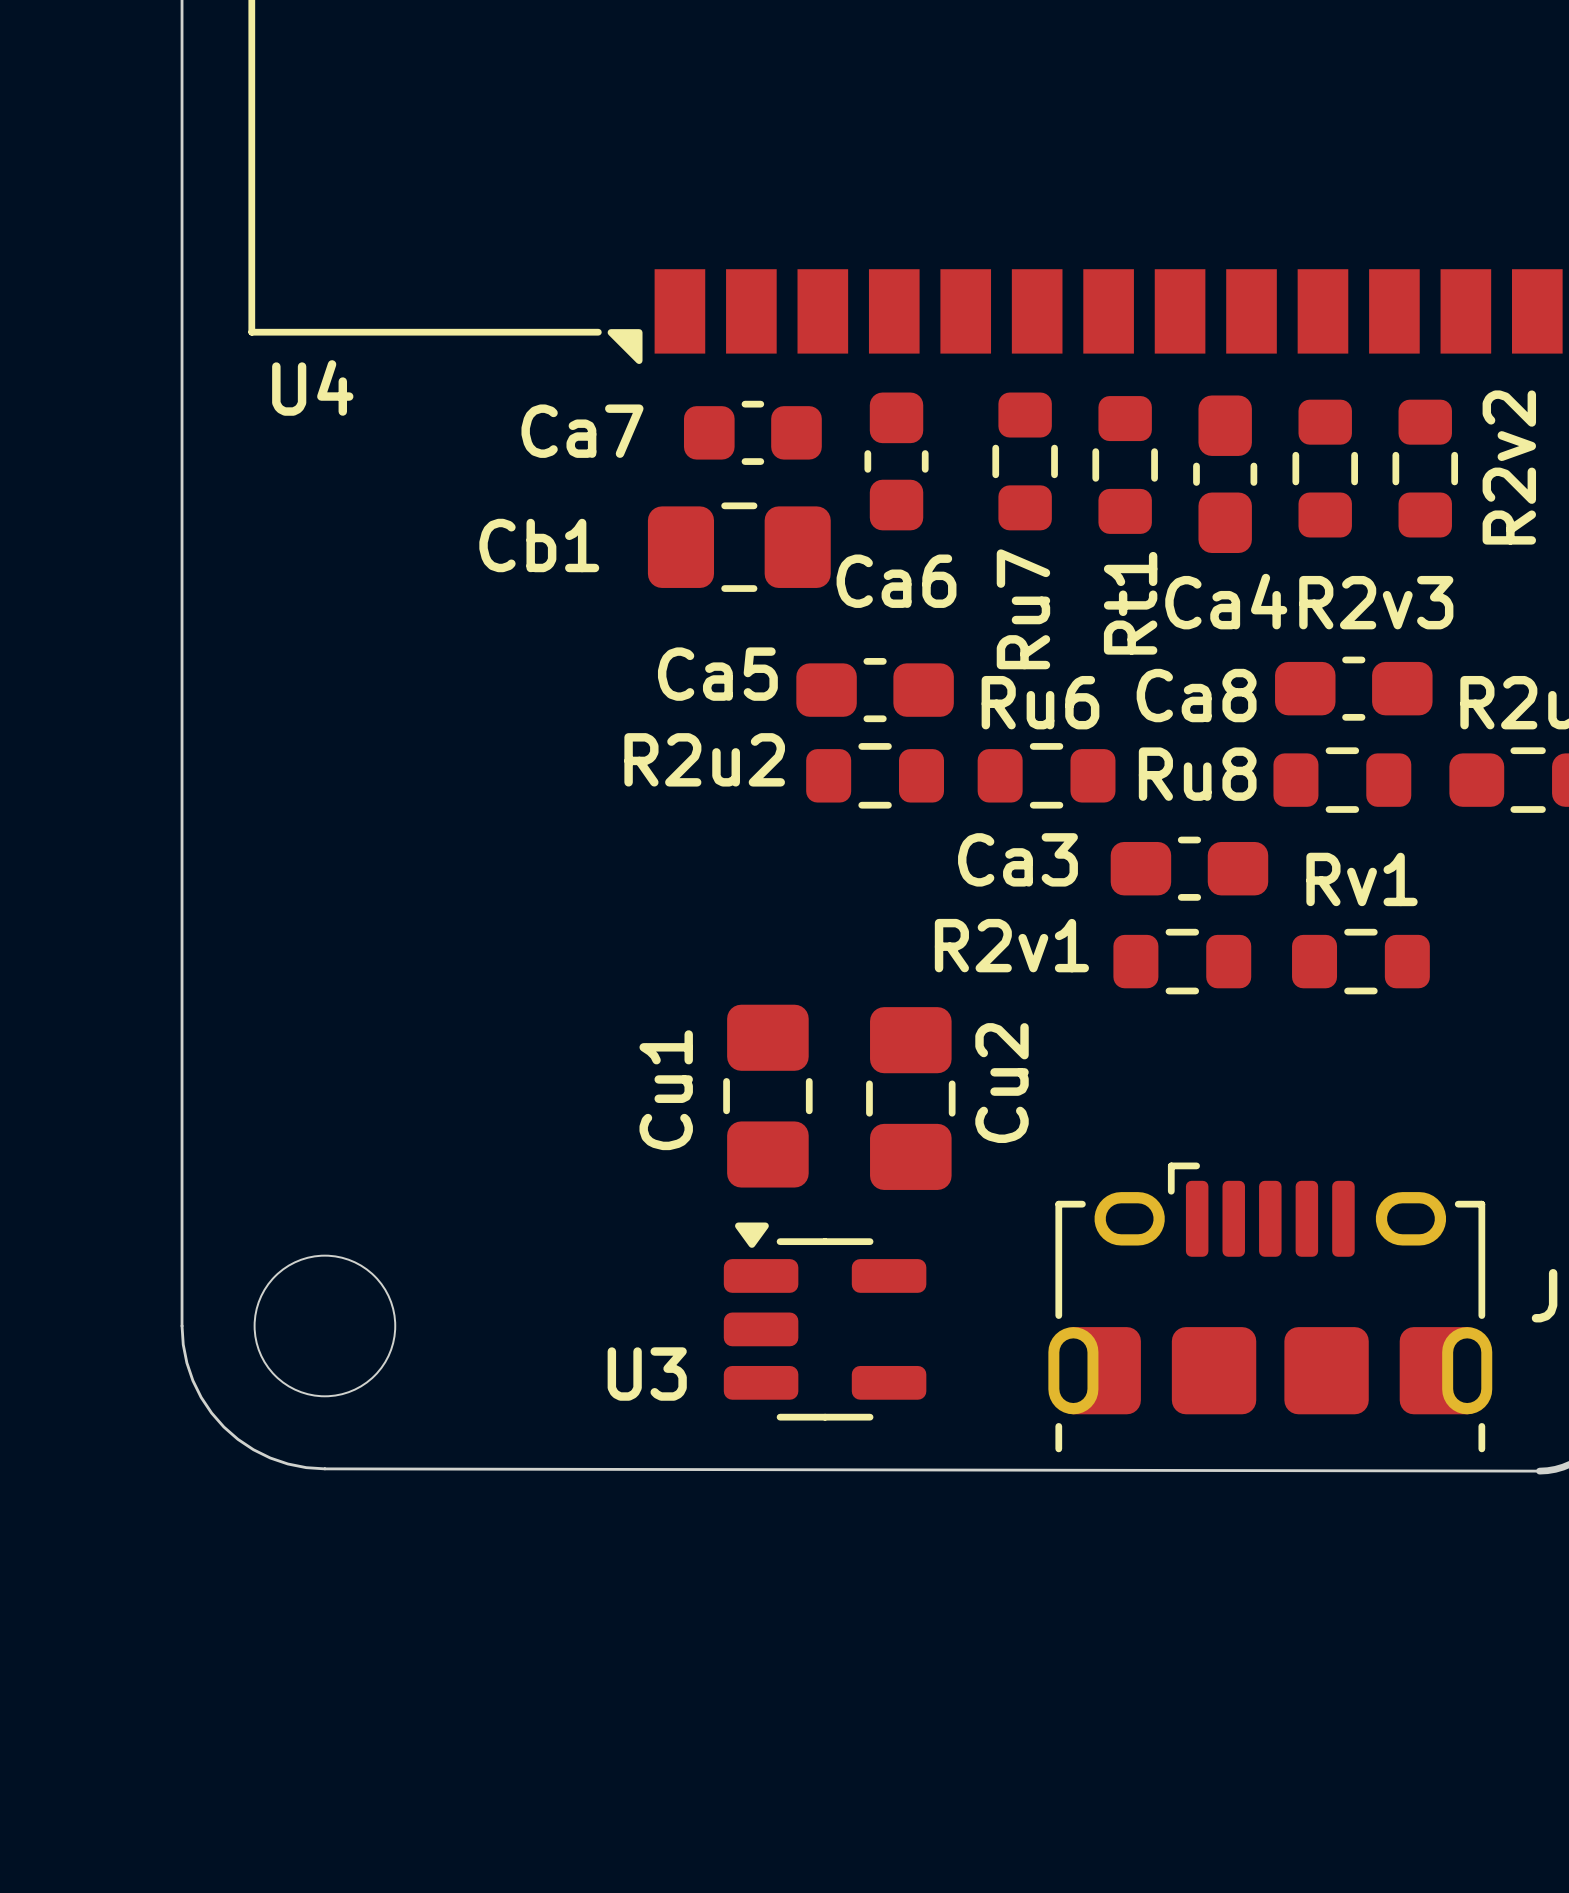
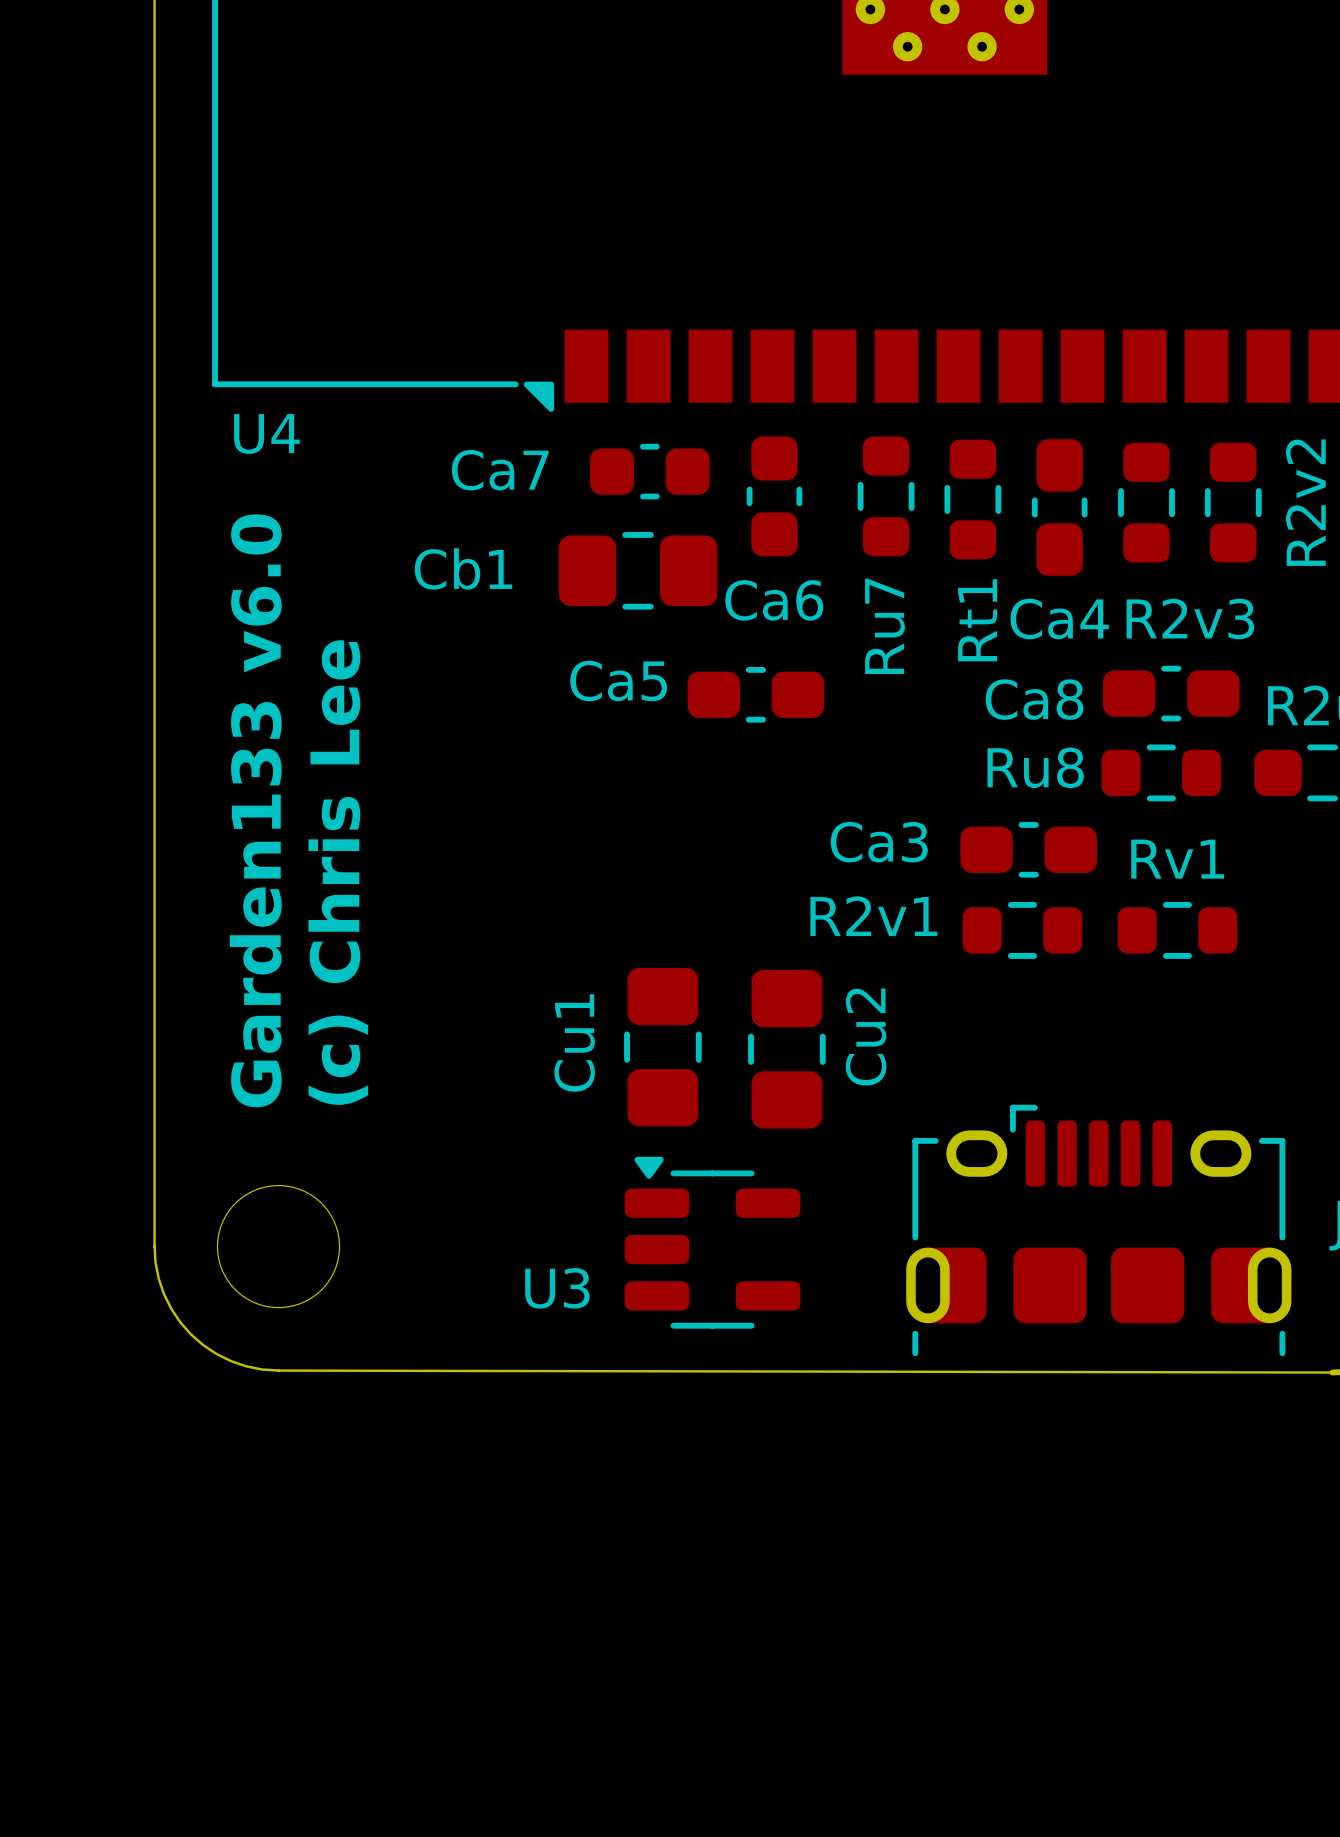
R2u2: (875, 775) -> none
Ru6: (1046, 775) -> none
text: none -> Garden133 v6.0 (255, 810)
text: none -> (c) Chris Lee (338, 872)

